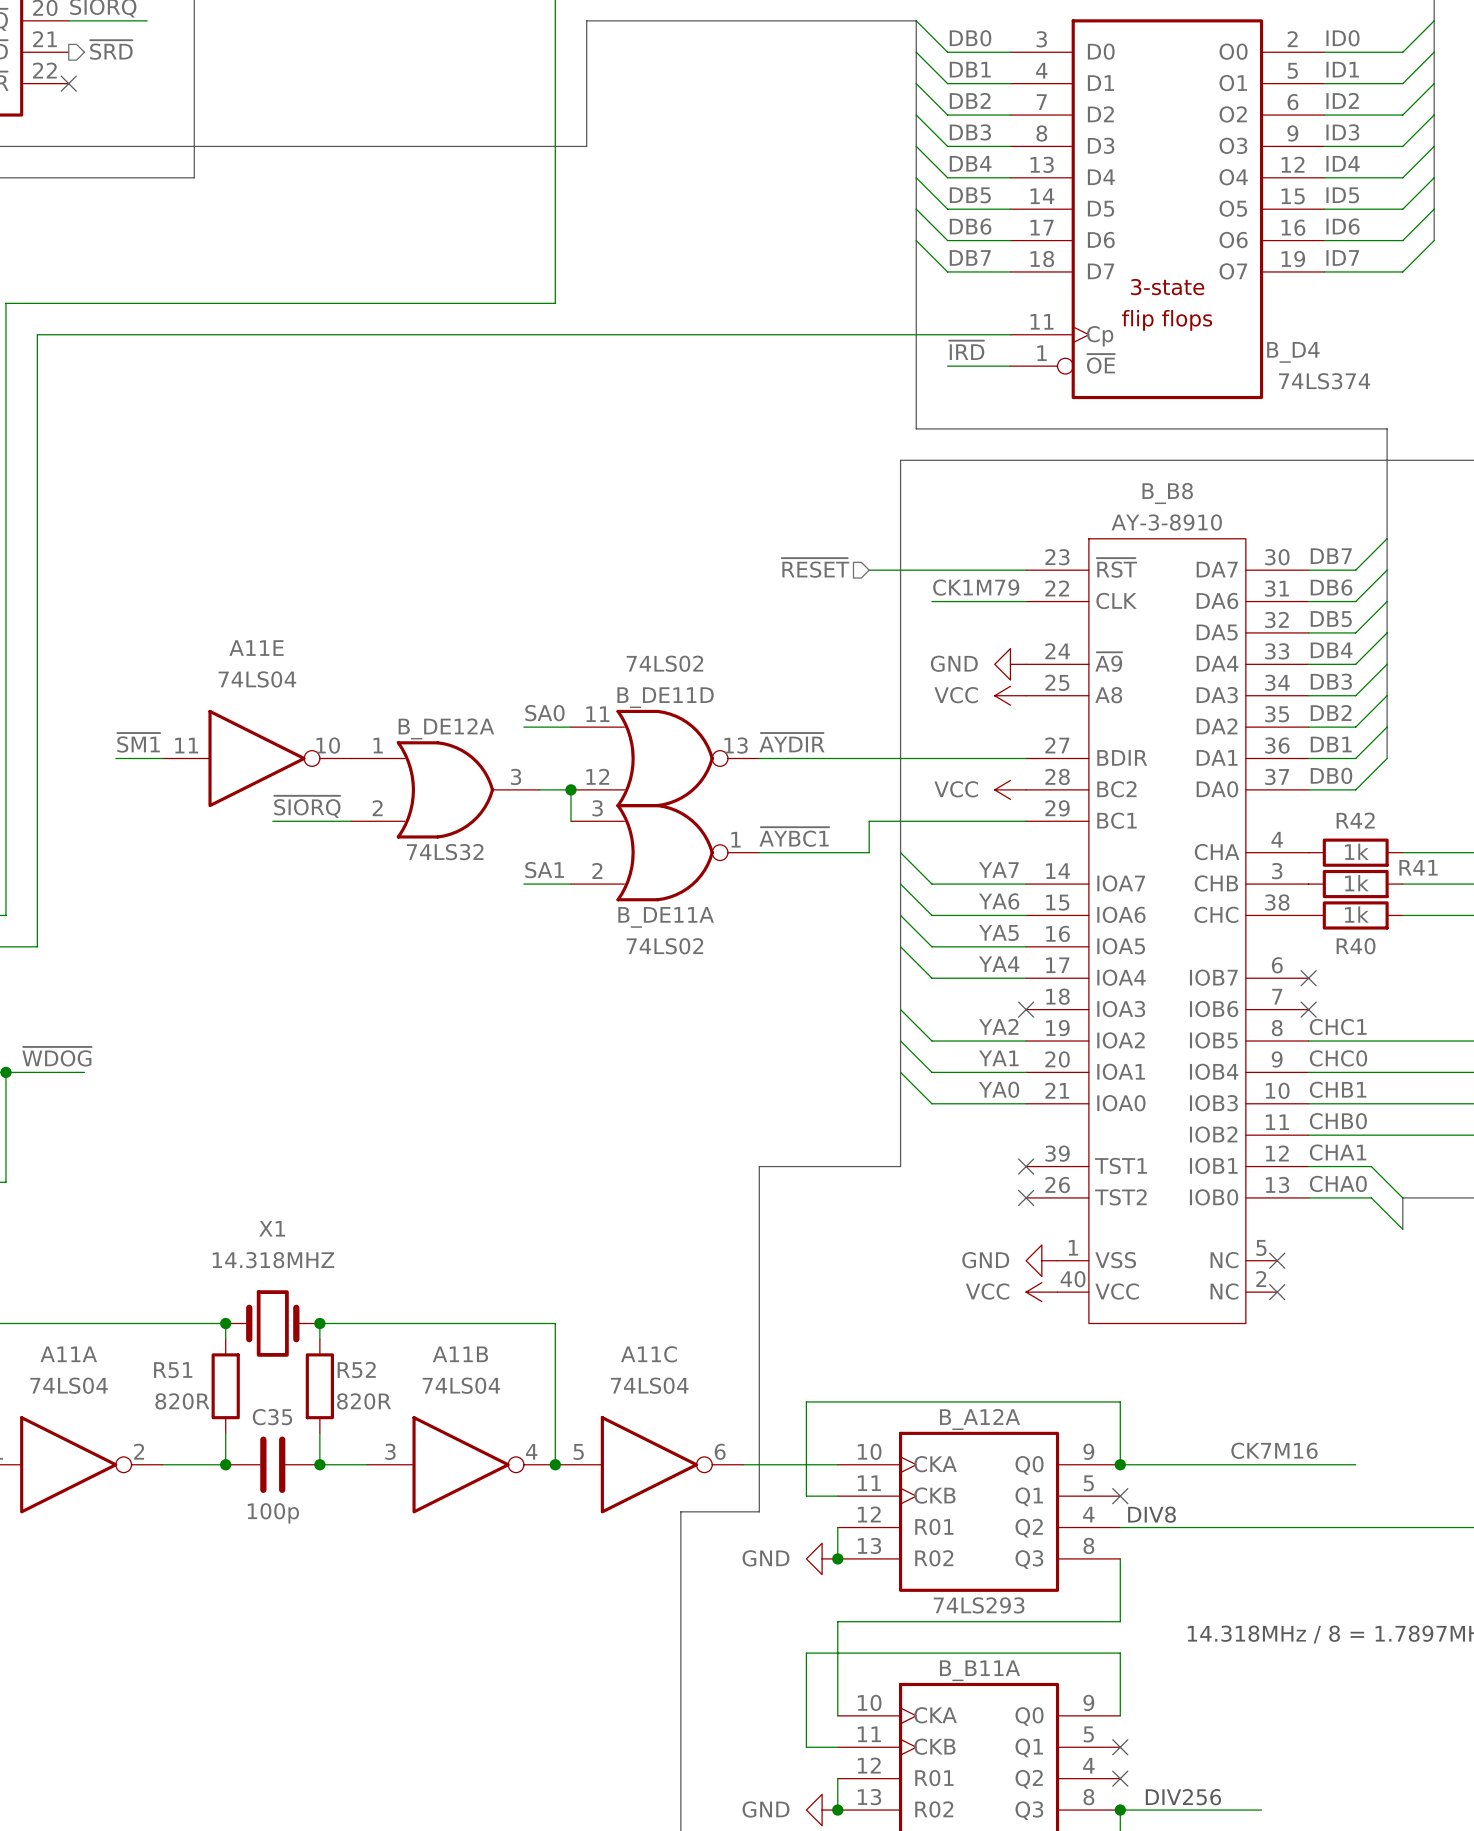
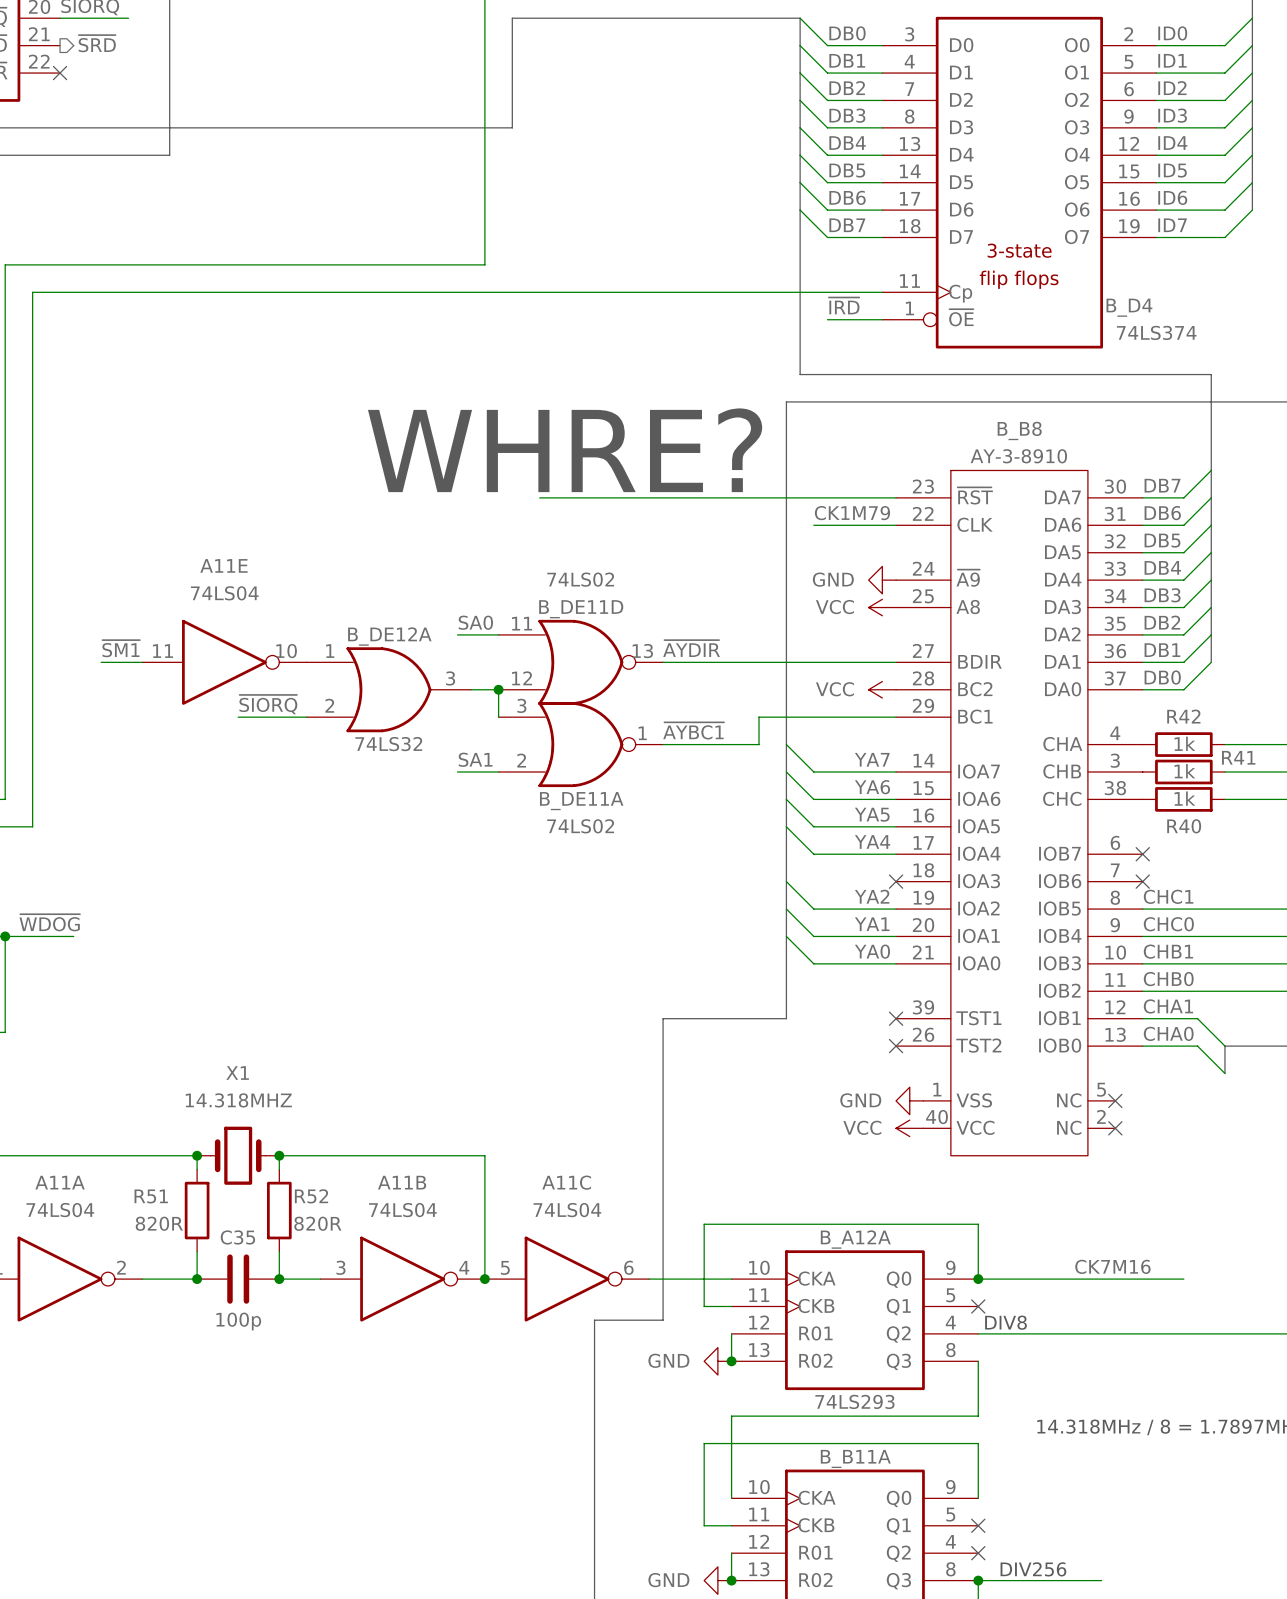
text: none -> WHRE? (565, 450)
hierarchical label: ~{RESET} (815, 567) -> none
wire: none -> (539, 497) (759, 497)

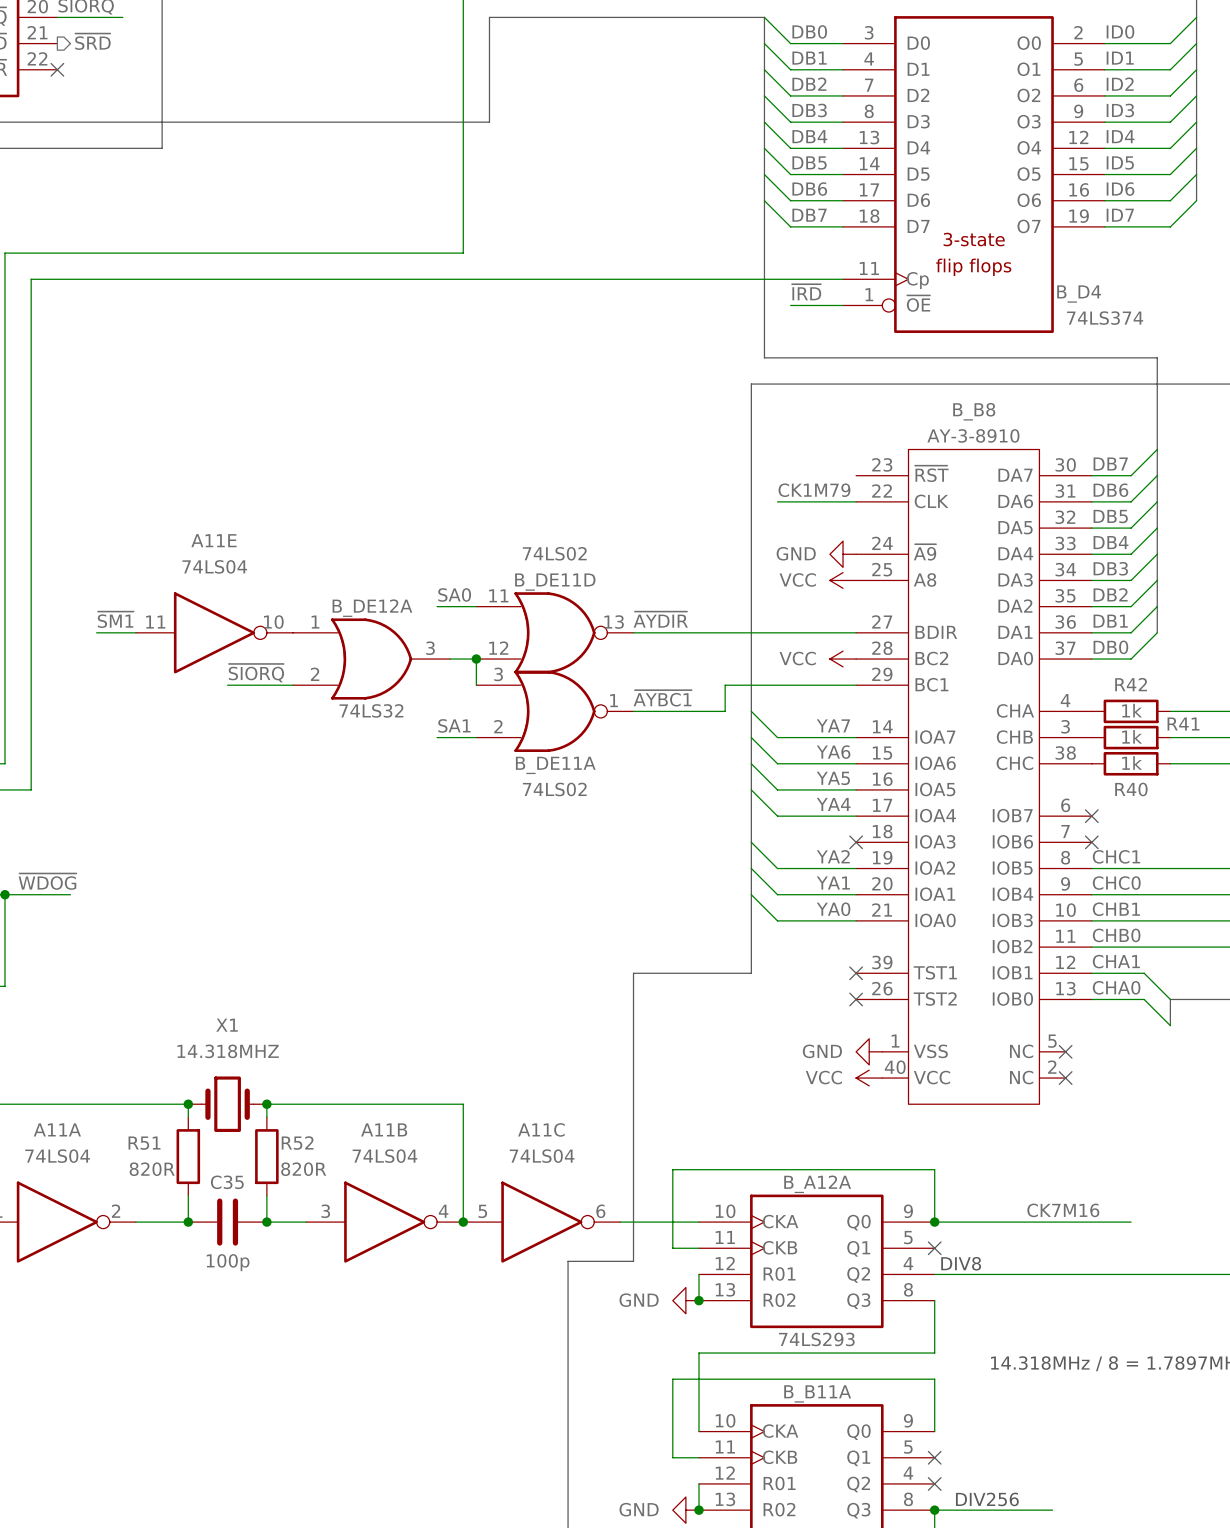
text: WHRE? (565, 450) -> none
wire: (539, 497) (896, 497) -> none

